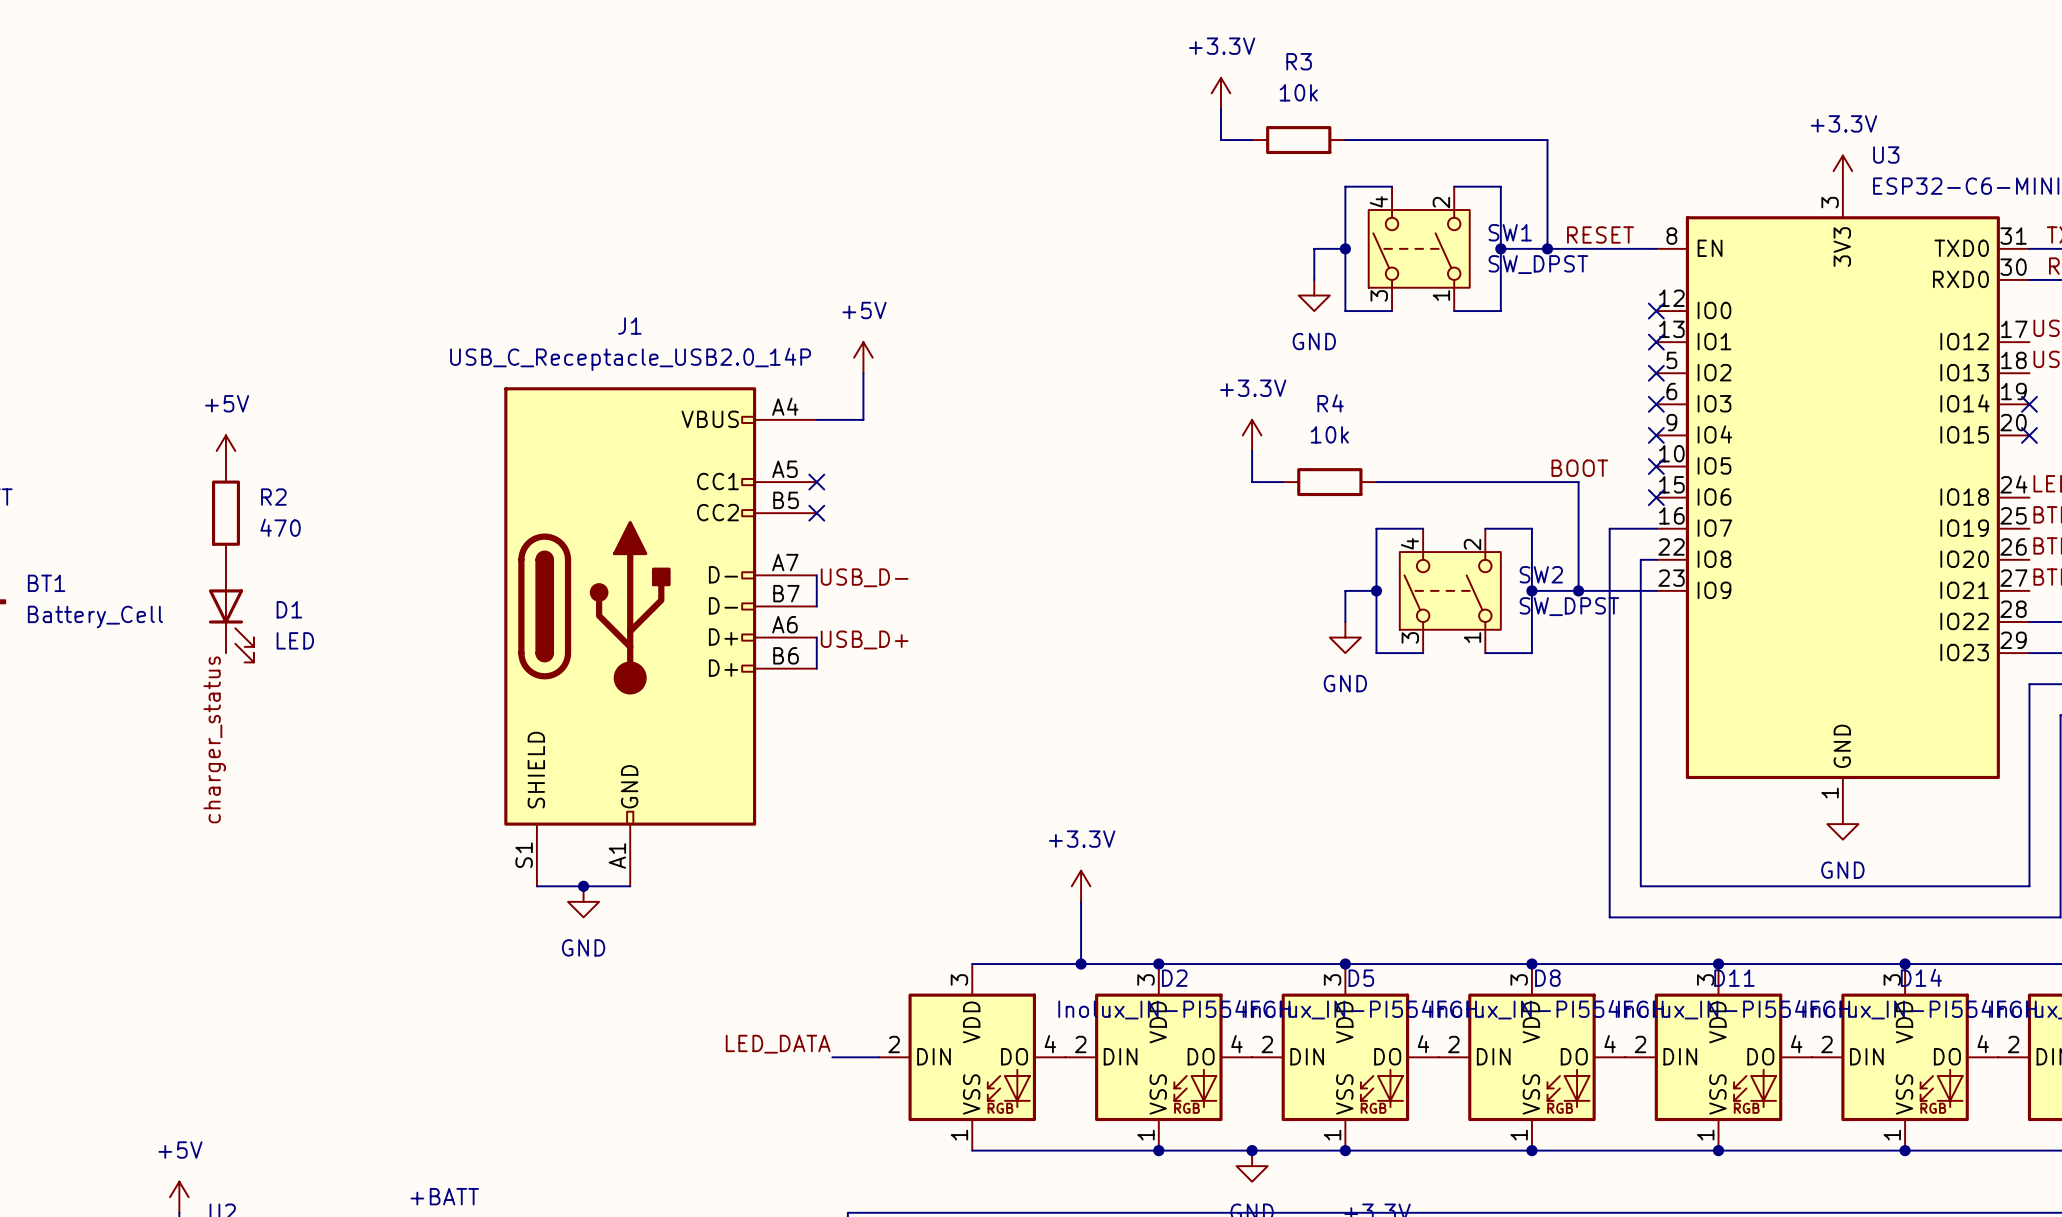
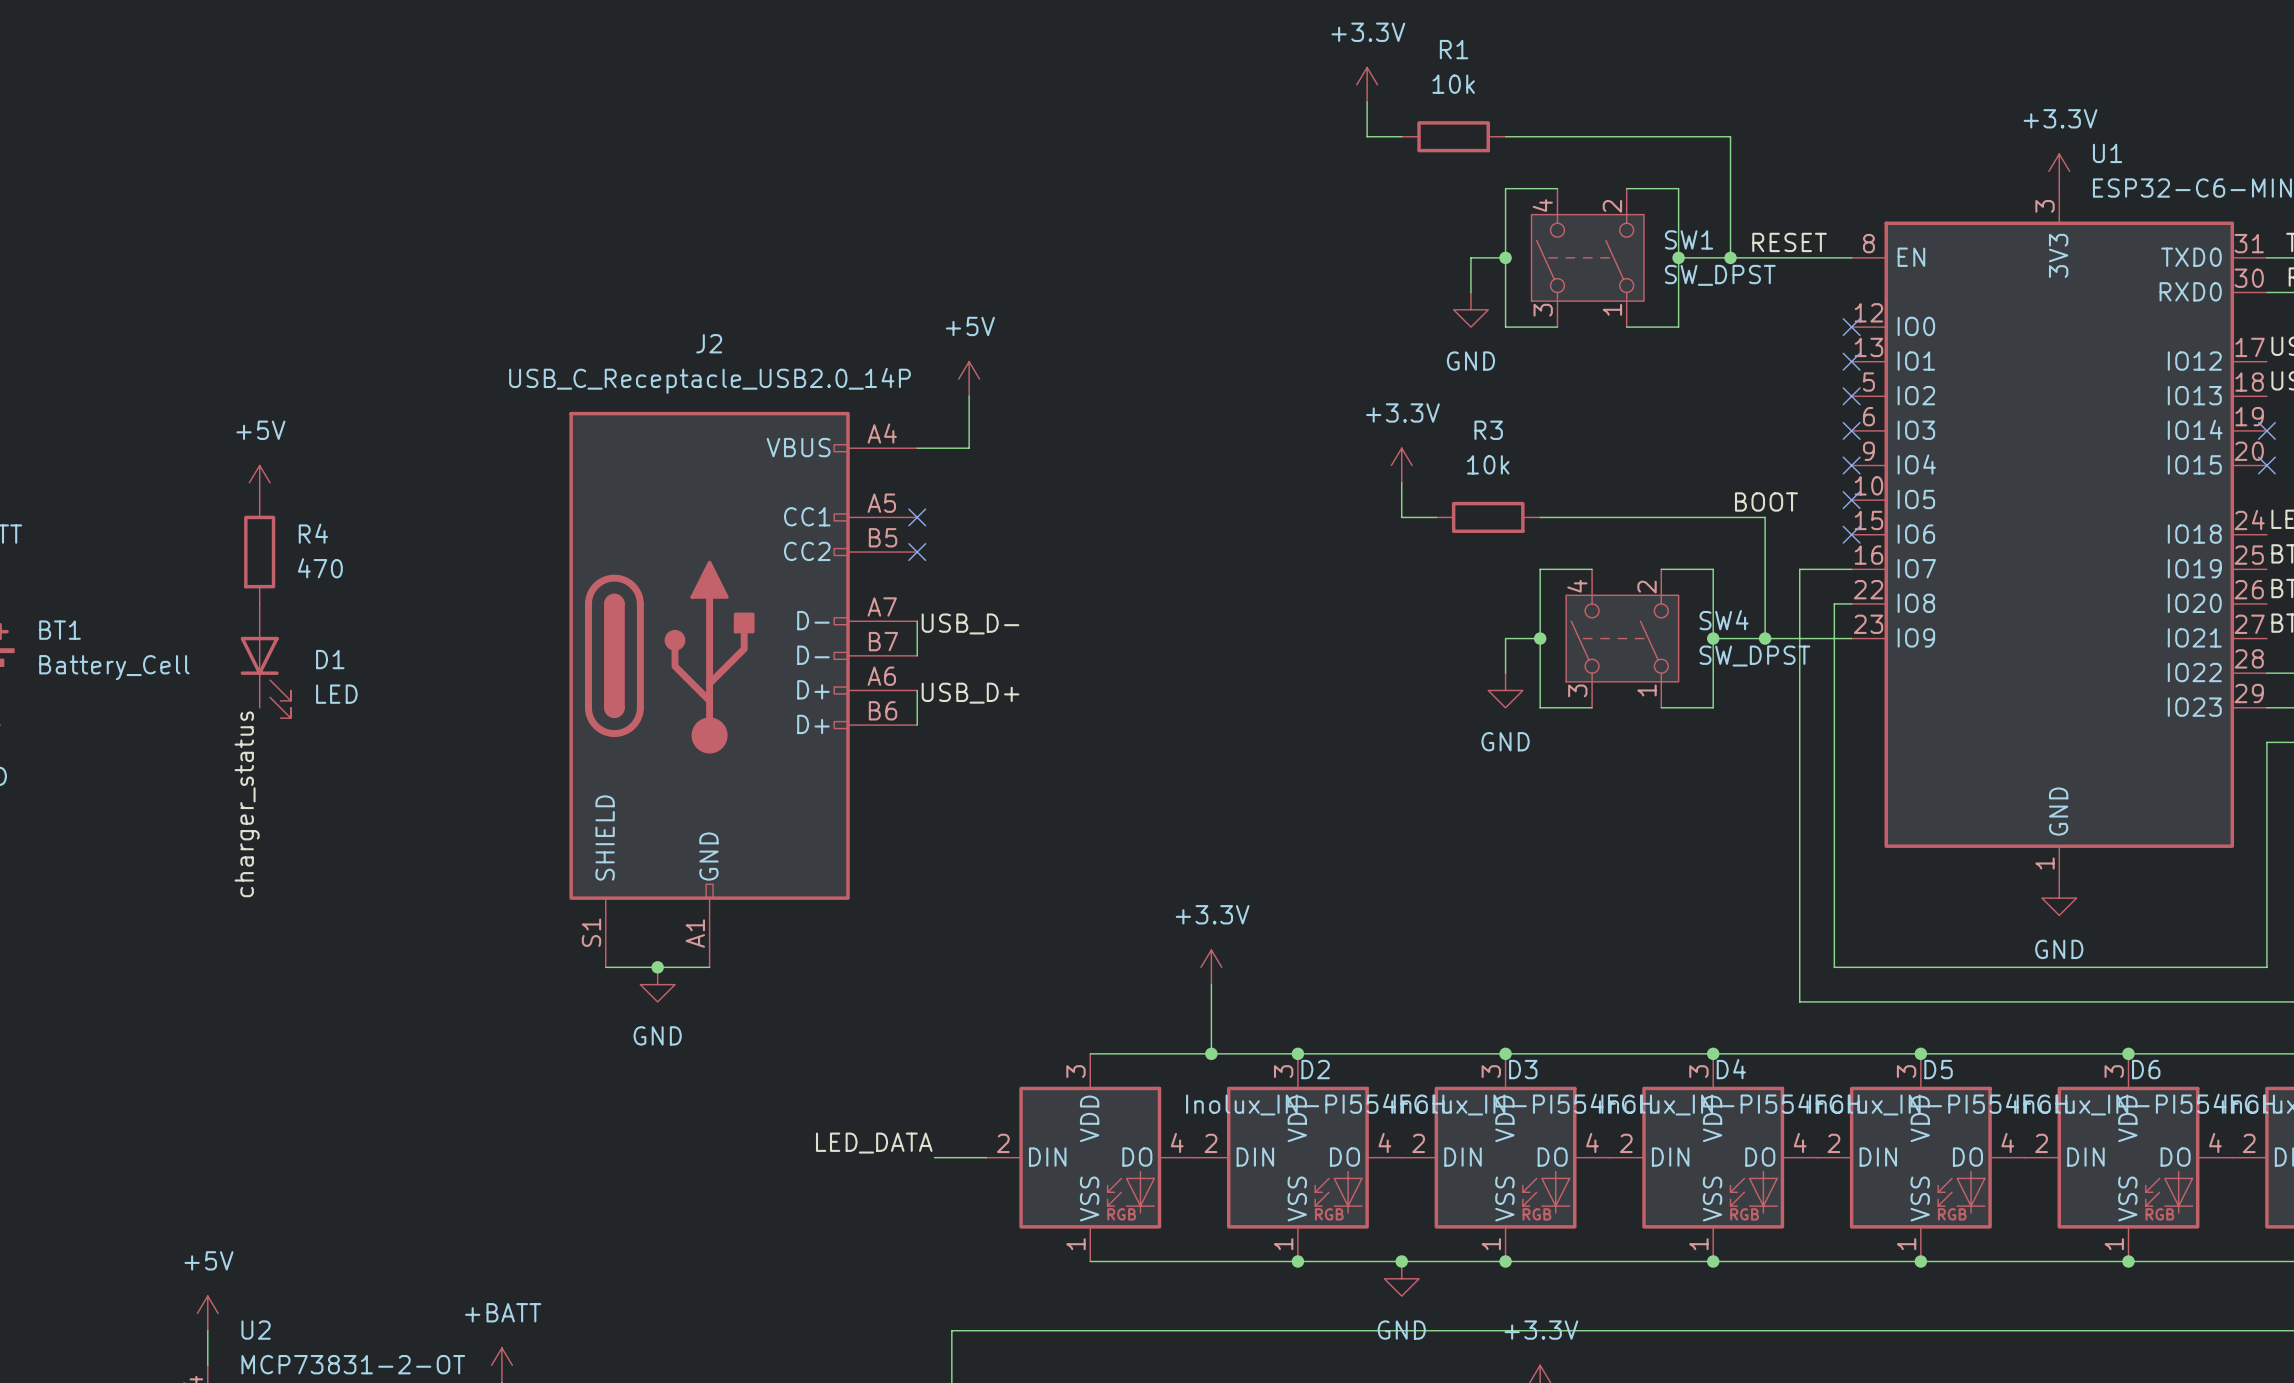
R3 name: R3 (1299, 61) -> R1 (1454, 49)
U3 name: U3 (1886, 155) -> U1 (2107, 153)
J1 name: J1 (629, 326) -> J2 (709, 343)
R4 name: R4 (1330, 403) -> R3 (1488, 430)
R2 name: R2 (273, 497) -> R4 (313, 533)
SW2 name: SW2 (1541, 574) -> SW4 (1724, 620)
D14 name: D14 (1921, 977) -> D6 (2146, 1069)
D5 name: D5 (1361, 978) -> D3 (1523, 1069)
D8 name: D8 (1547, 978) -> D4 (1731, 1069)
D11 name: D11 (1734, 978) -> D5 (1938, 1069)

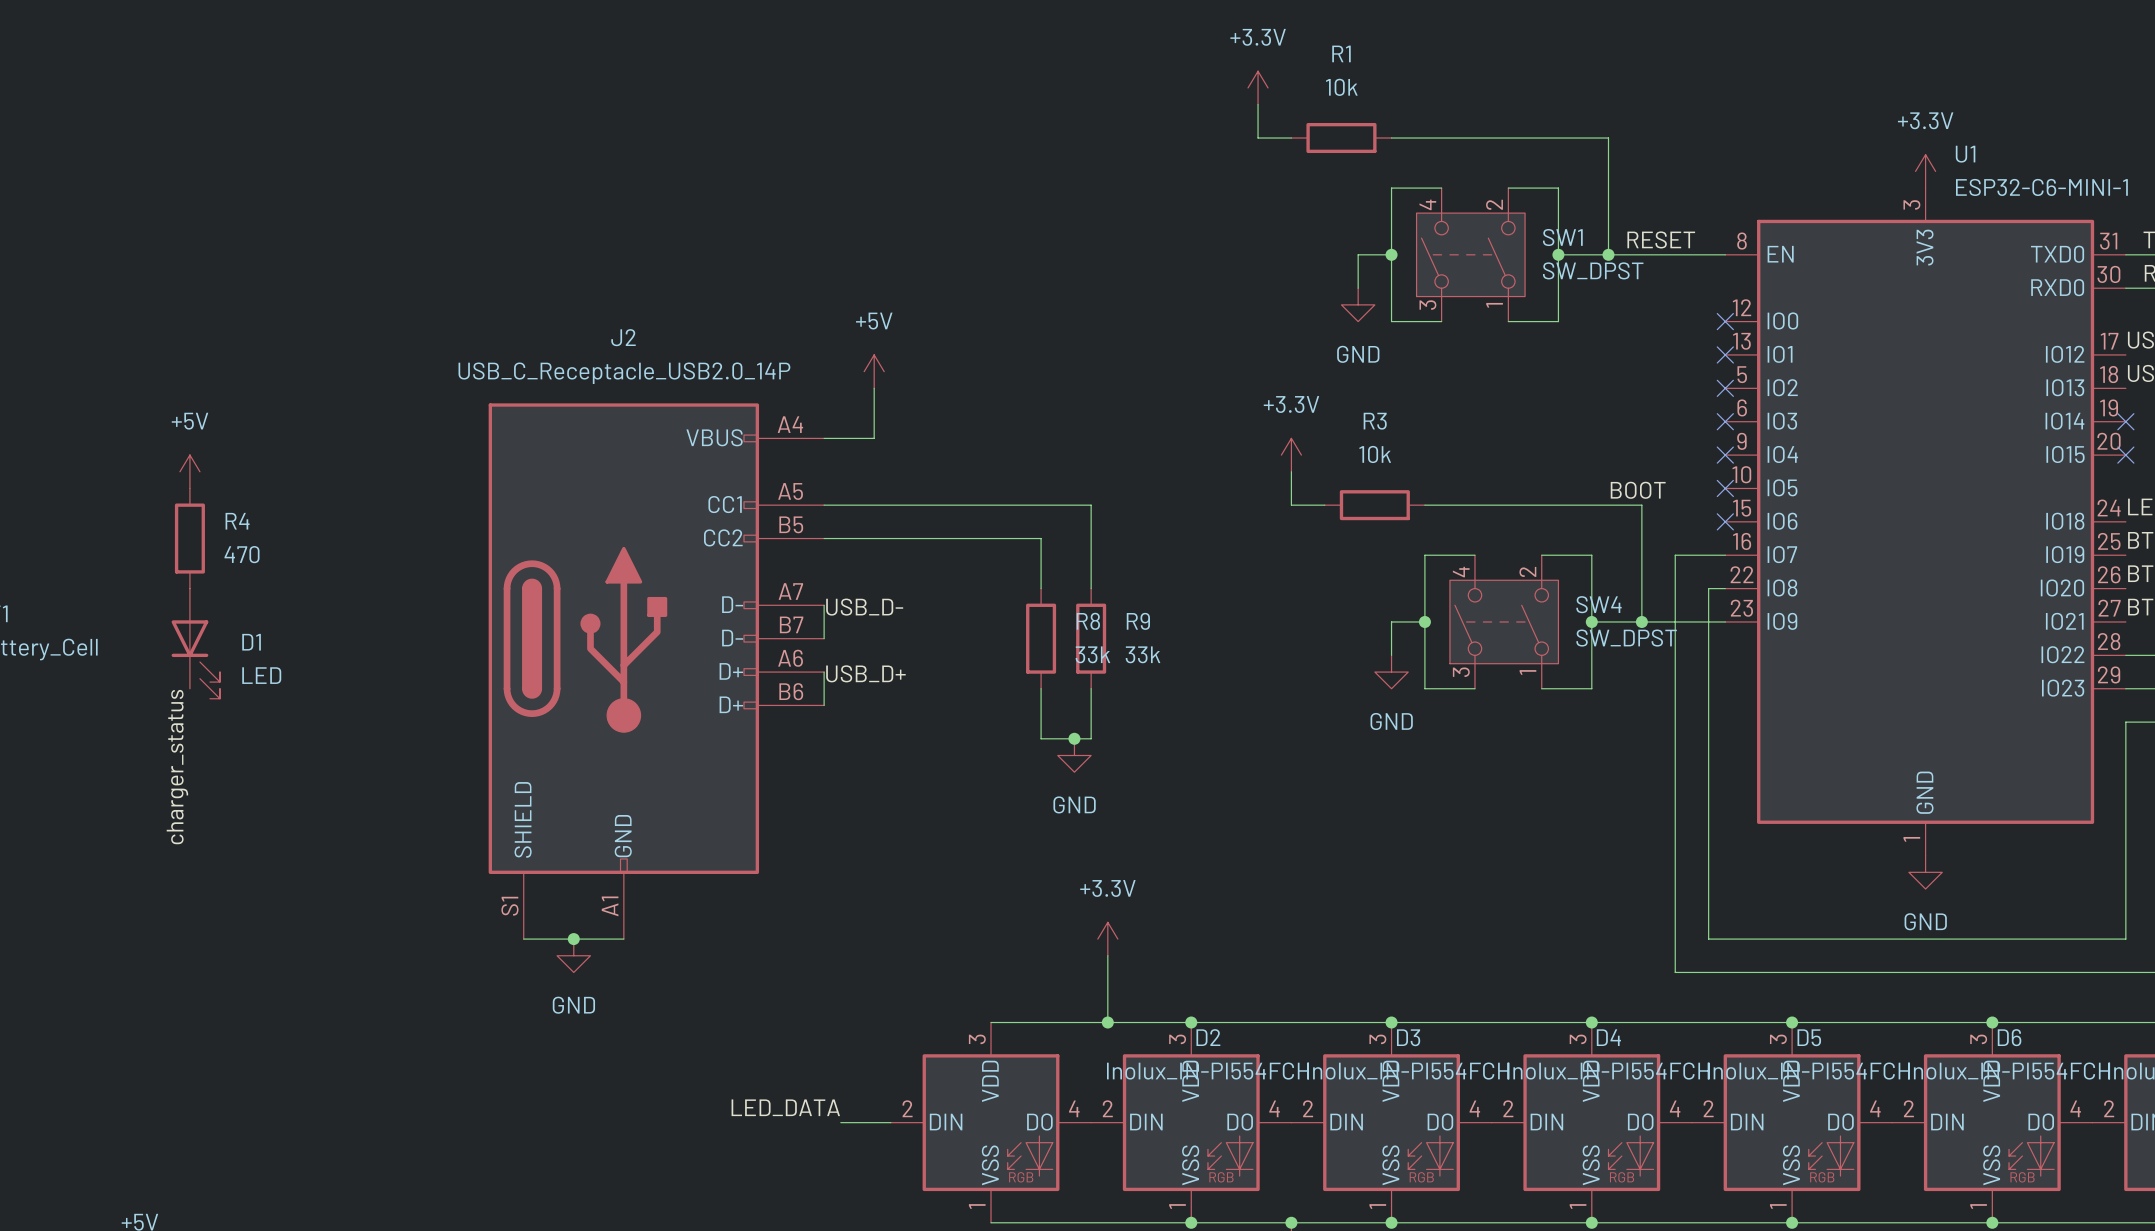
wire: none -> (824, 505) (1091, 505) (1091, 588)
no-connect mark: (917, 517) -> none
wire: none -> (824, 538) (1041, 538) (1041, 588)
no-connect mark: (917, 552) -> none
R8: none -> 33k (1041, 638)
R9: none -> 33k (1091, 638)
wire: none -> (1041, 688) (1041, 738) (1091, 738) (1091, 688)
junction: none -> (1074, 738)
power symbol: none -> GND (1074, 755)

